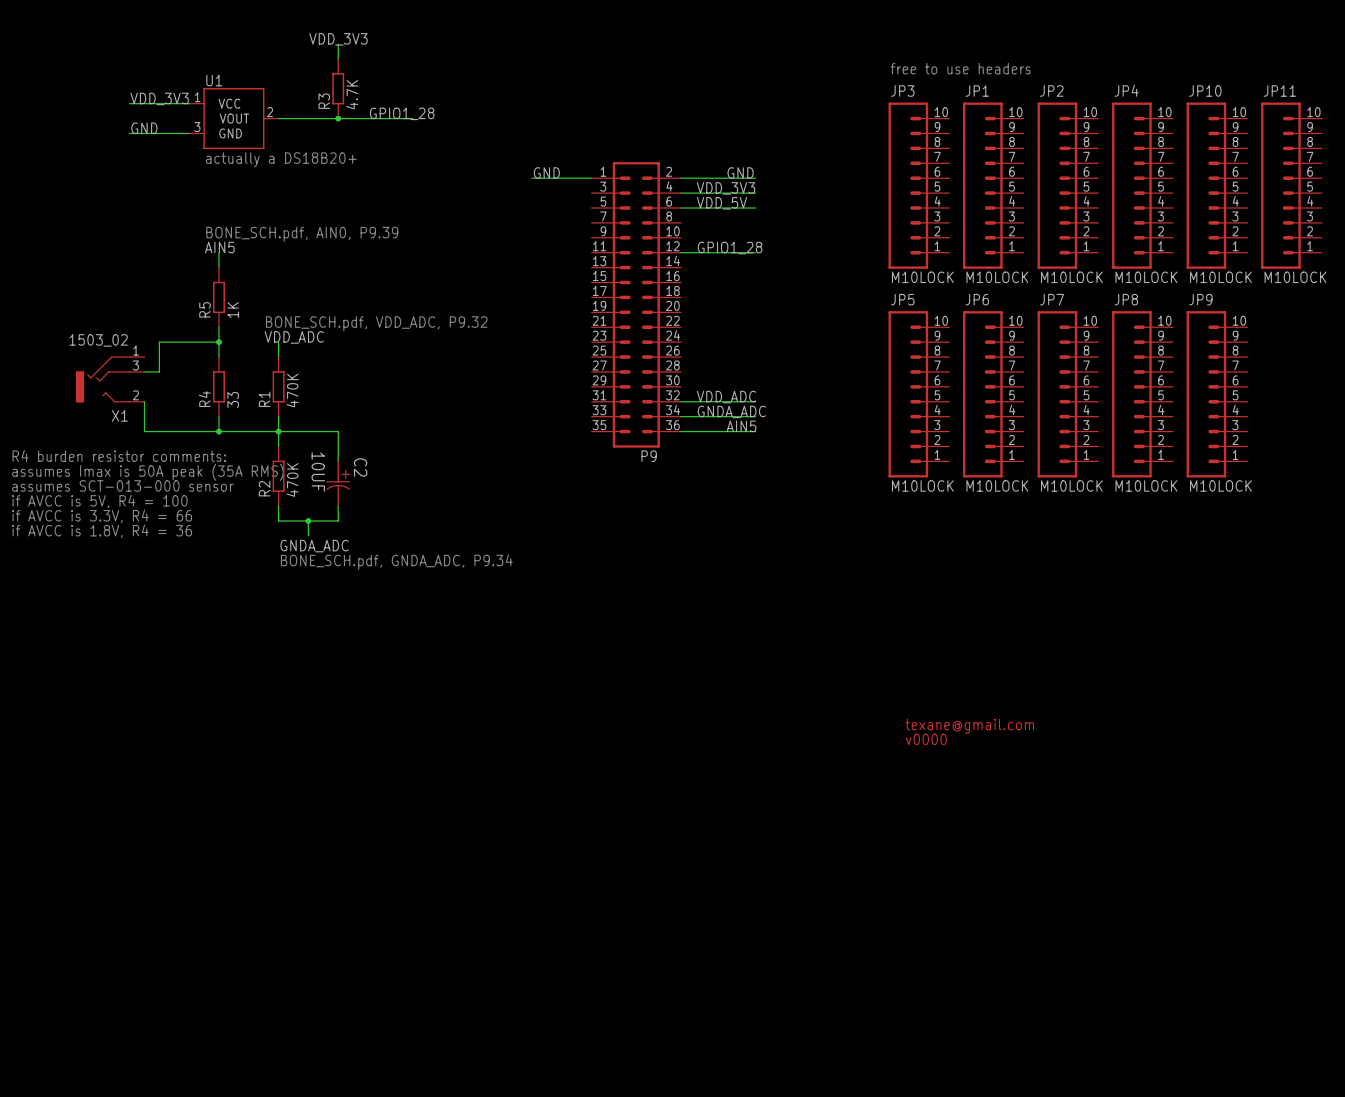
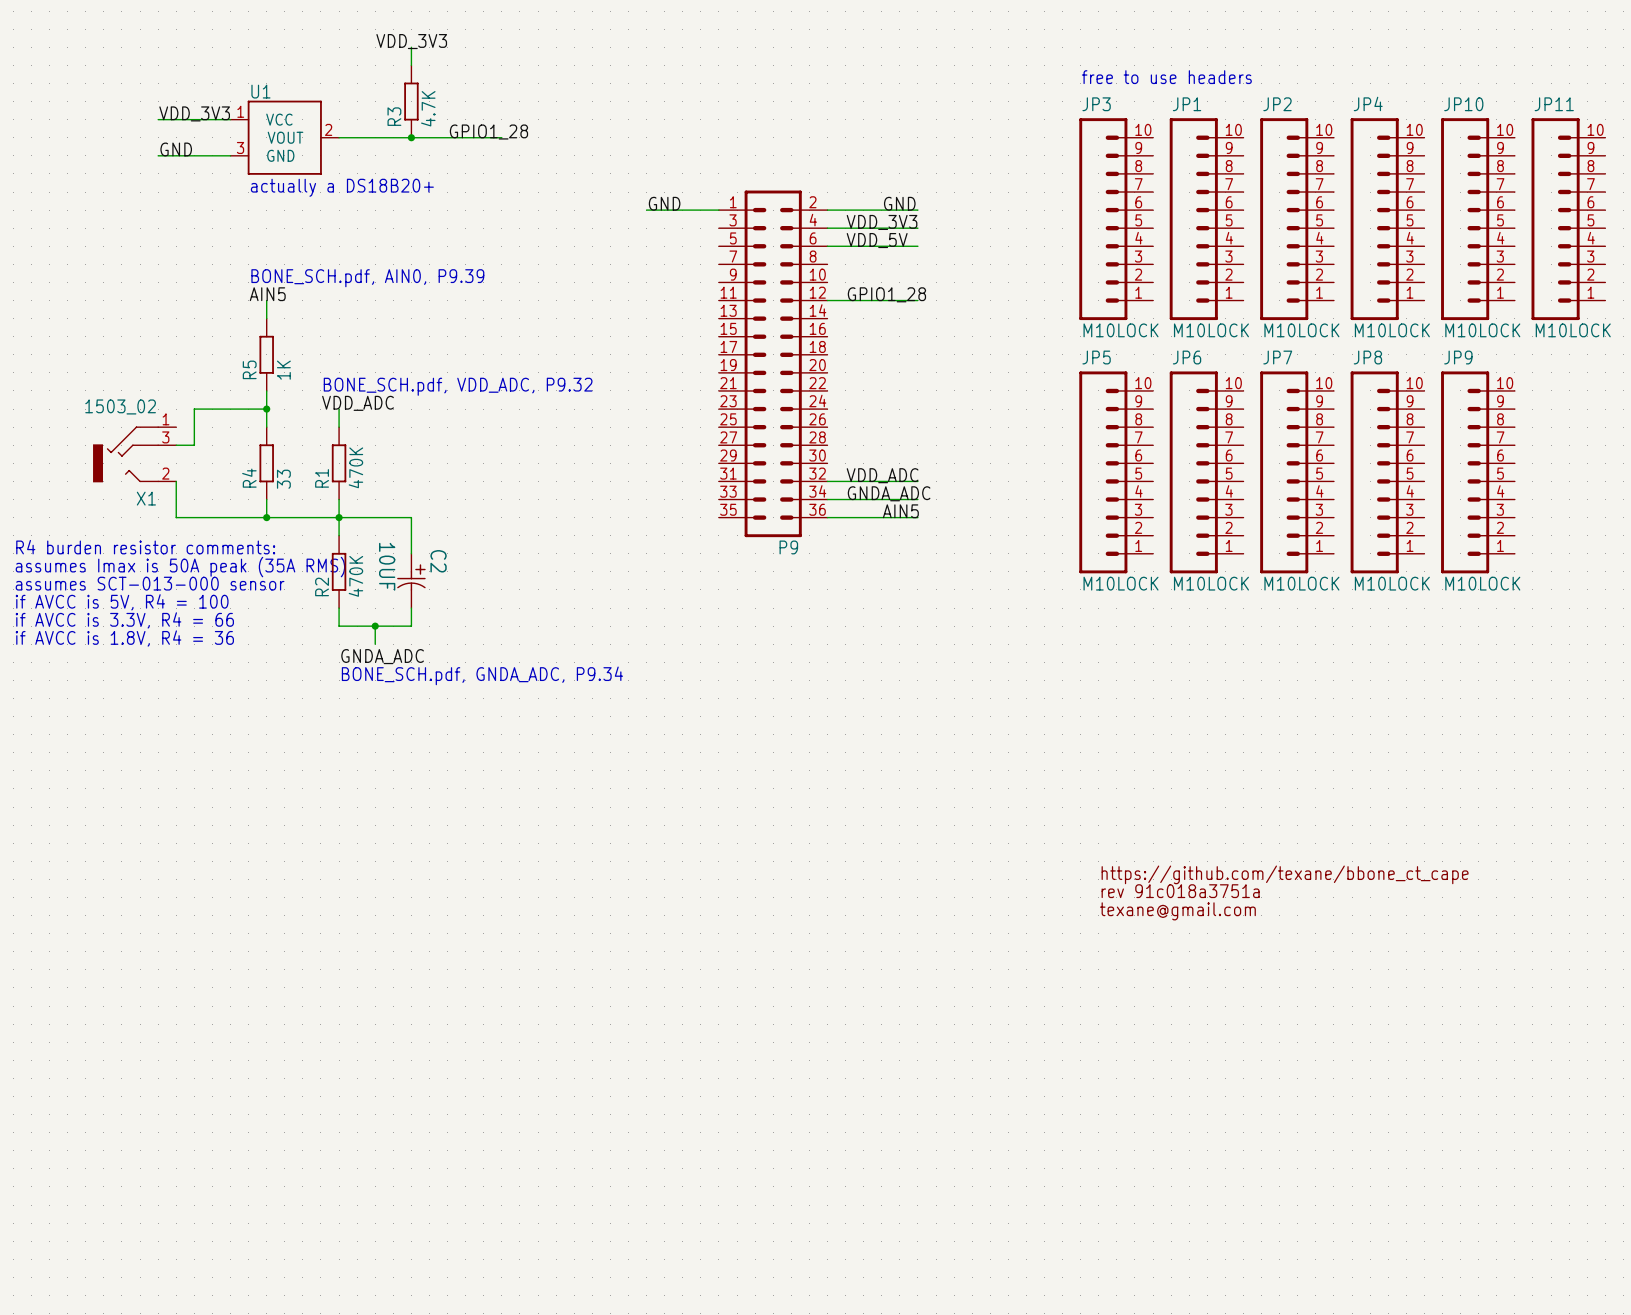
text: texane@gmail.com (969, 726) -> https://github.com/texane/bbone_ct_cape (1285, 874)
text: v0000 (926, 739) -> rev 91c018a3751a (1180, 891)
text: none -> texane@gmail.com (1177, 911)

